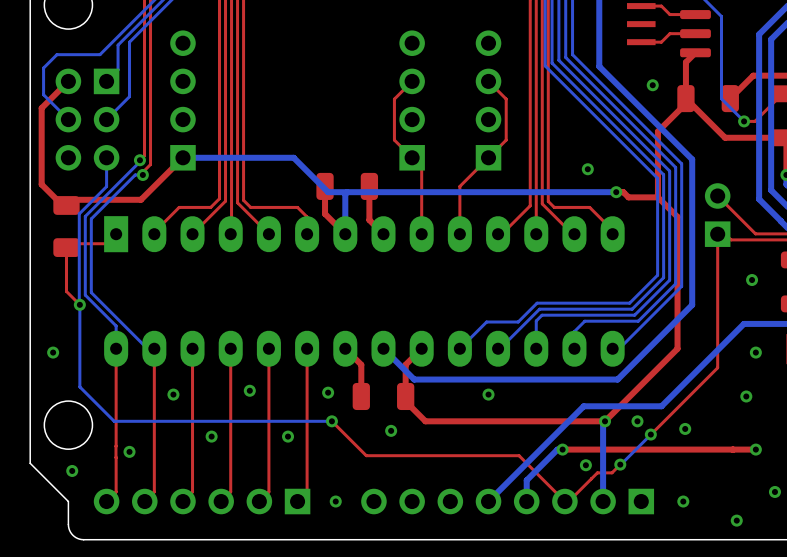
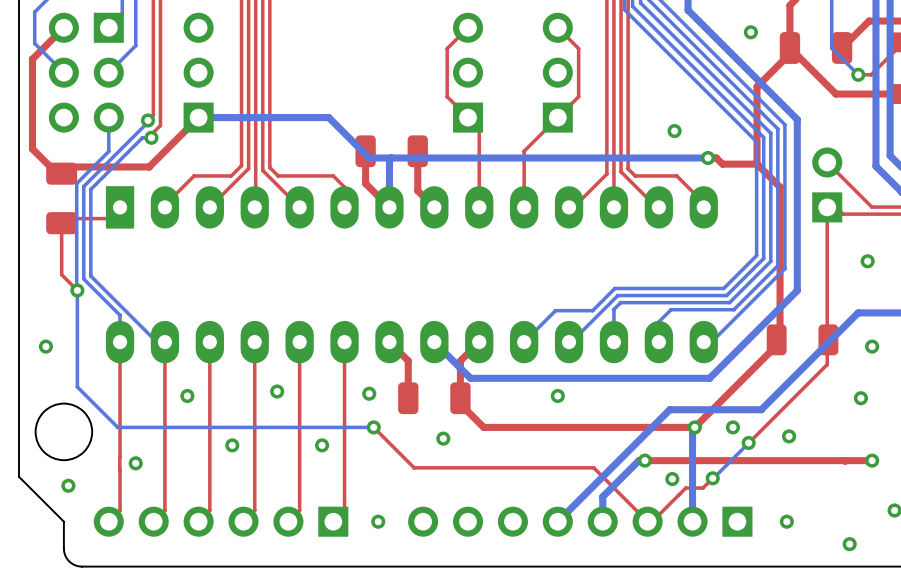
part: none -> (802, 339)

